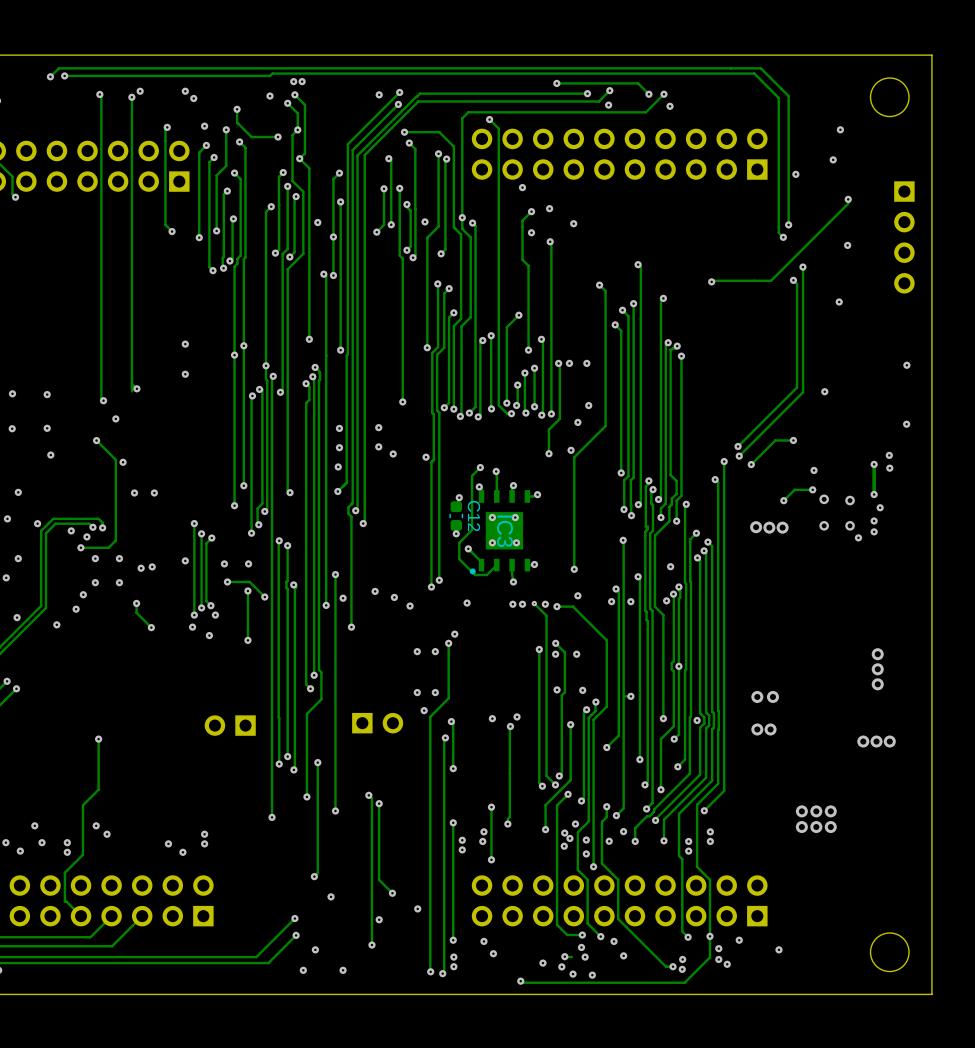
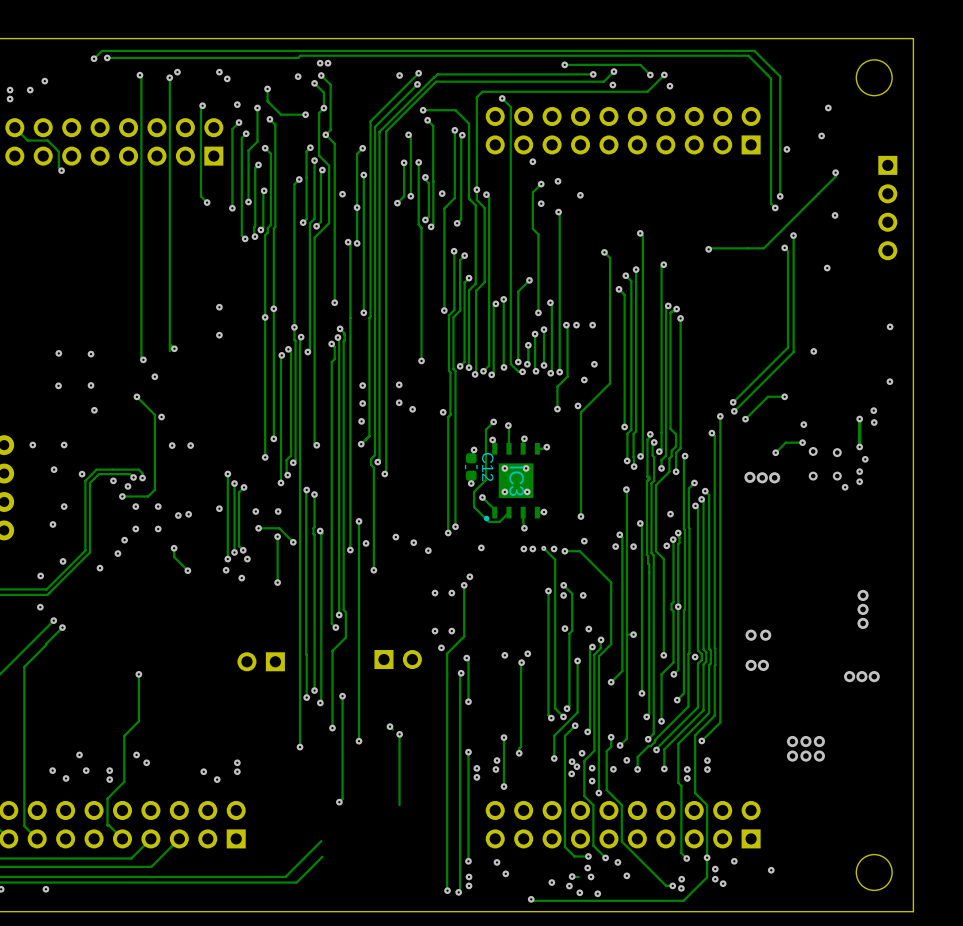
track: (371, 798) (371, 945) -> none
track: (379, 879) (392, 893) -> none
via: (392, 893) -> none
via: (331, 896) -> none
via: (417, 908) -> none
via: (294, 918) -> none
via: (379, 919) -> none
via: (296, 935) -> none
via: (371, 945) -> none
via: (315, 949) -> none
via: (303, 970) -> none
via: (343, 970) -> none

